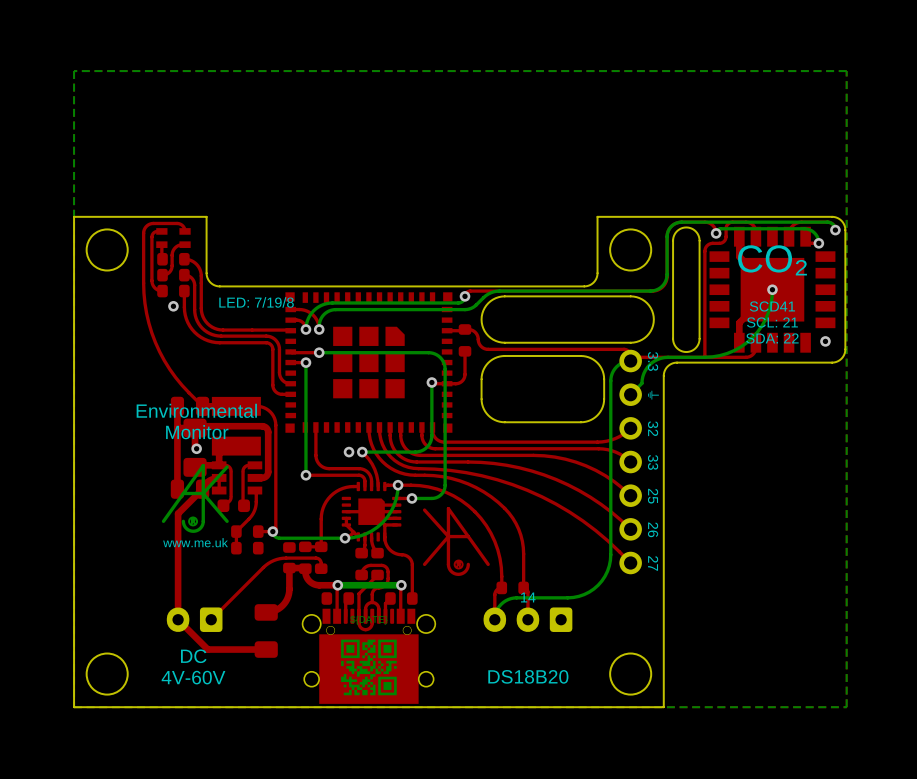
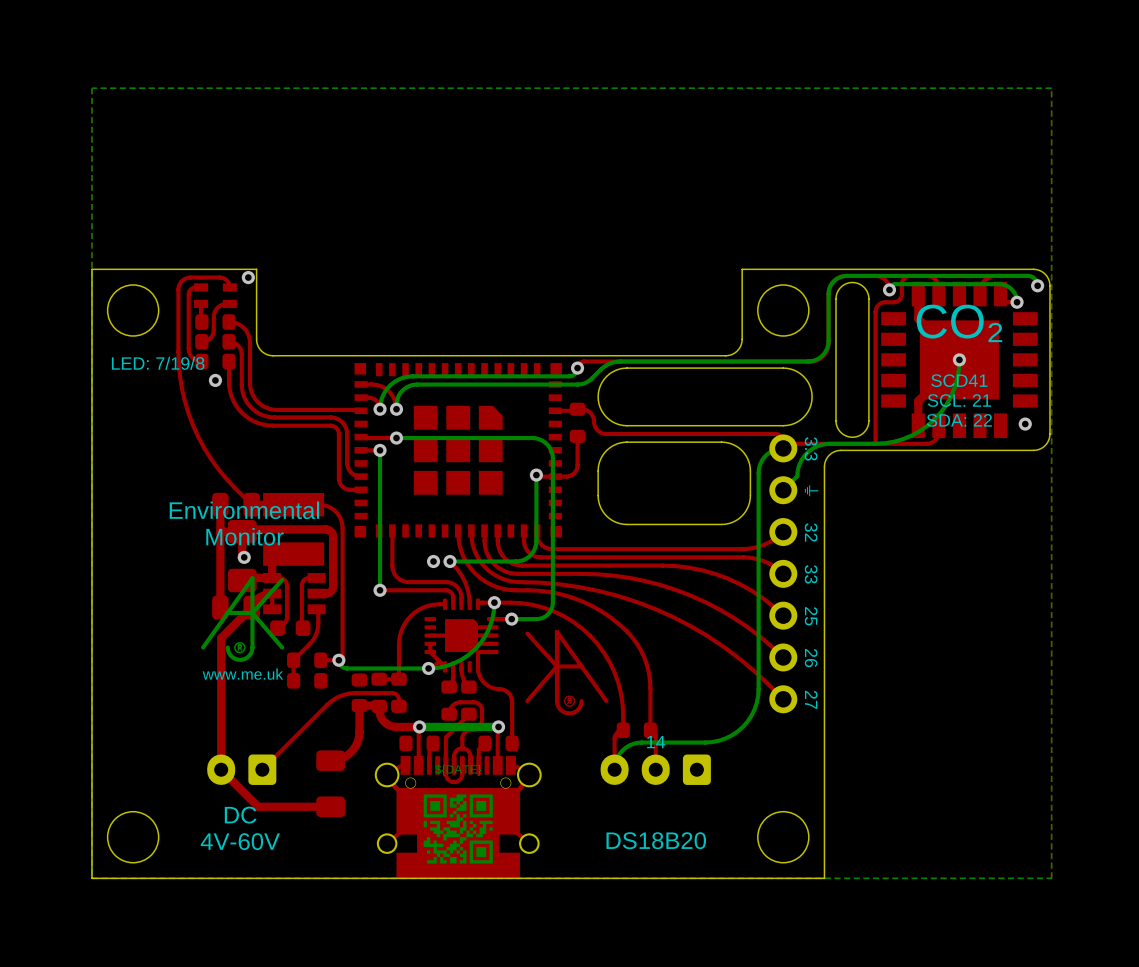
via: none -> (248, 277)
text position: LED: 7/19/8 (256, 302) -> LED: 7/19/8 (158, 363)
part footprint: [301, 608, 437, 704] -> [374, 756, 542, 879]

